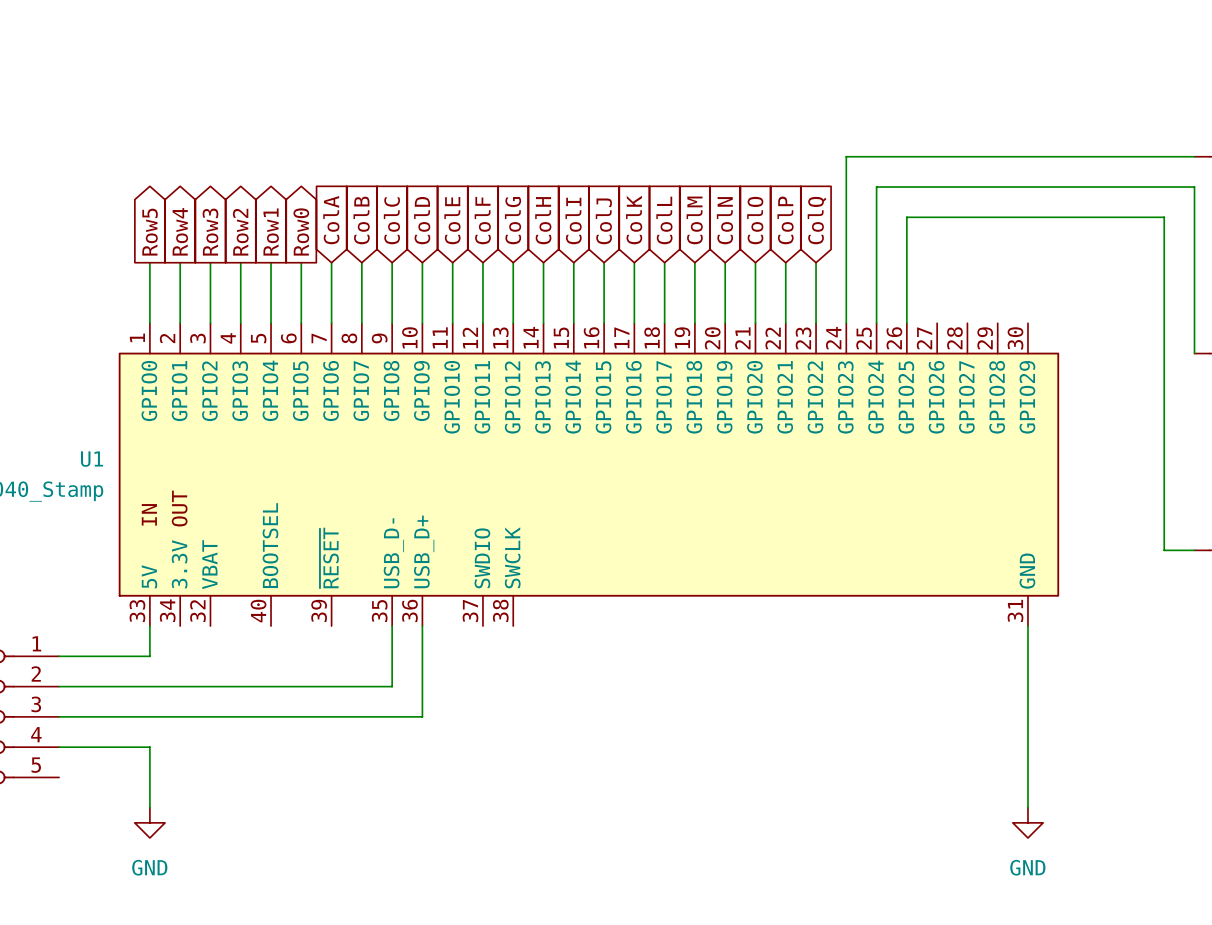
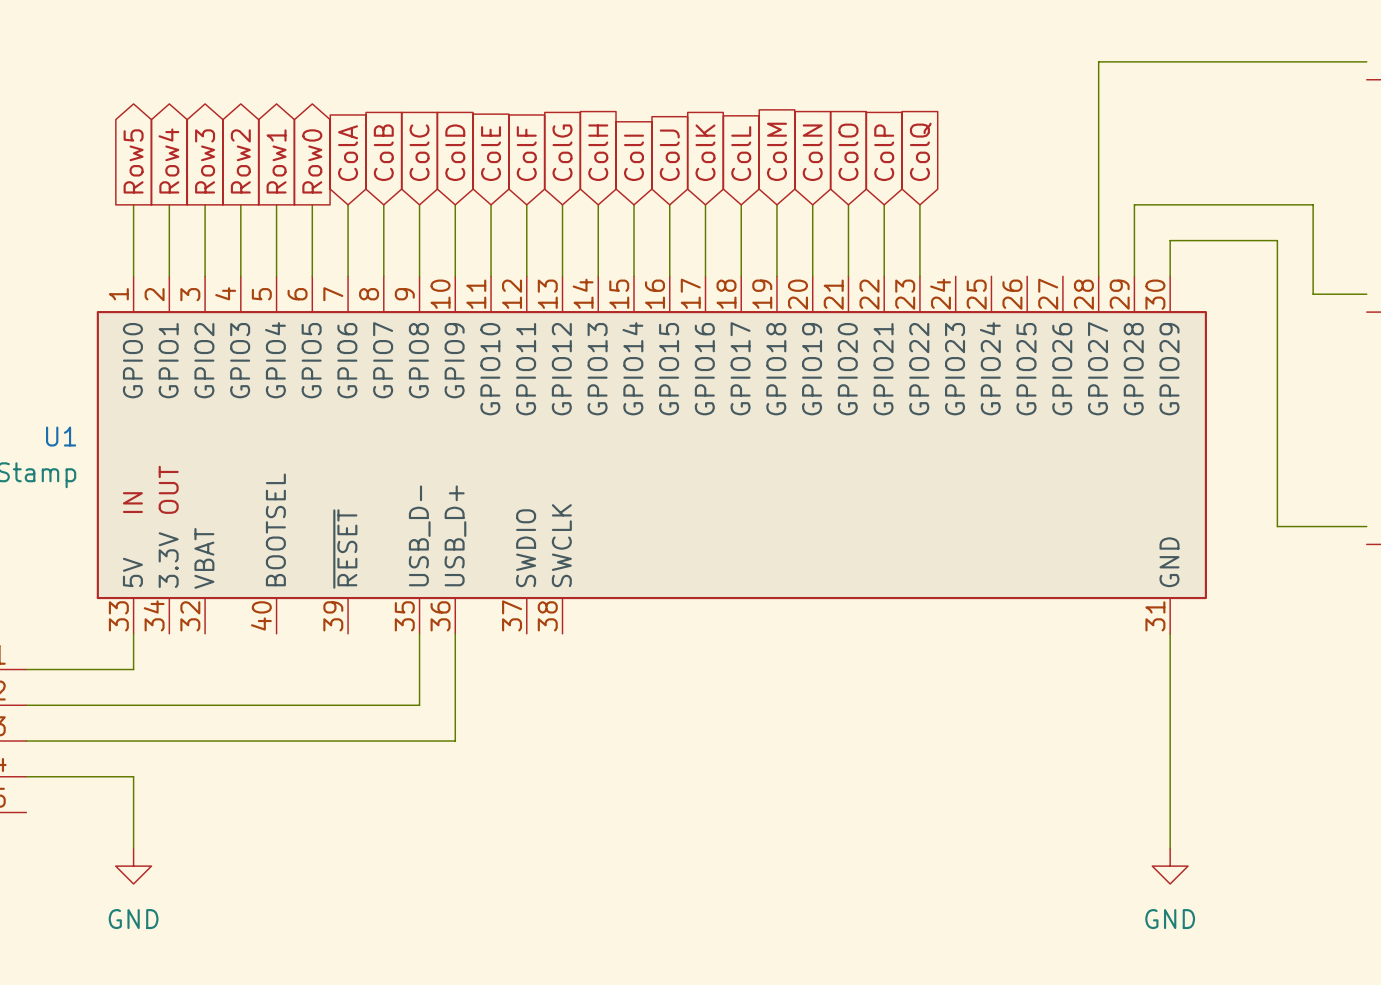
wire: none -> (1366, 61) (1098, 61) (1098, 276)
wire: (1194, 156) (846, 156) (846, 323) -> none
wire: (876, 323) (876, 187) (1194, 187) (1194, 353) -> none
wire: (906, 323) (906, 217) (1164, 217) (1164, 550) (1194, 550) -> none
wire: none -> (1134, 276) (1134, 204) (1313, 204) (1313, 294) (1366, 294)
wire: none -> (1170, 276) (1170, 240) (1277, 240) (1277, 526) (1366, 526)

